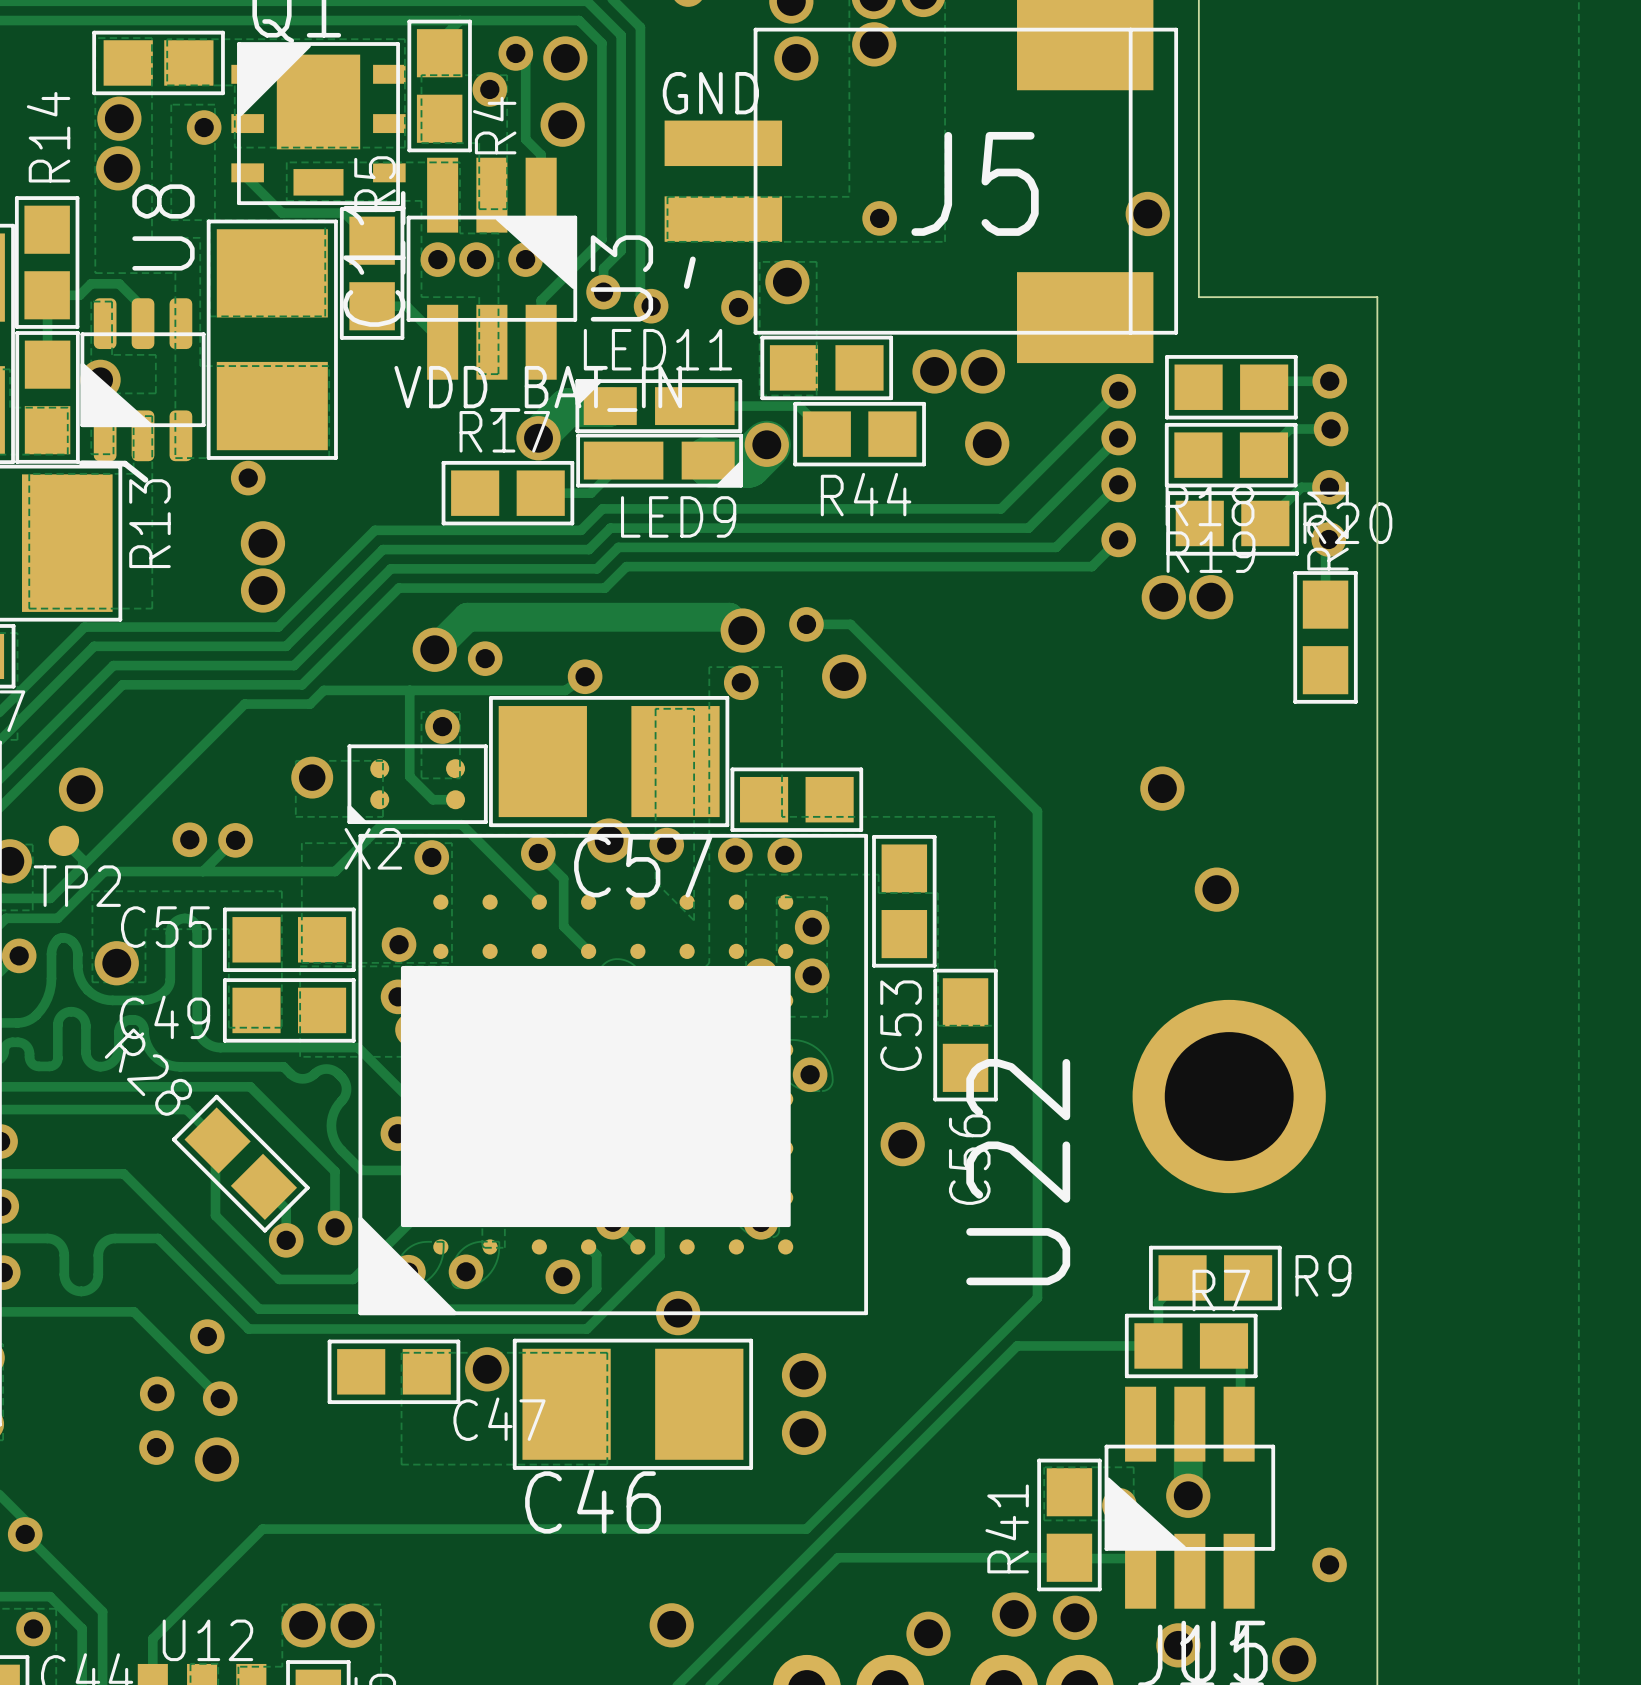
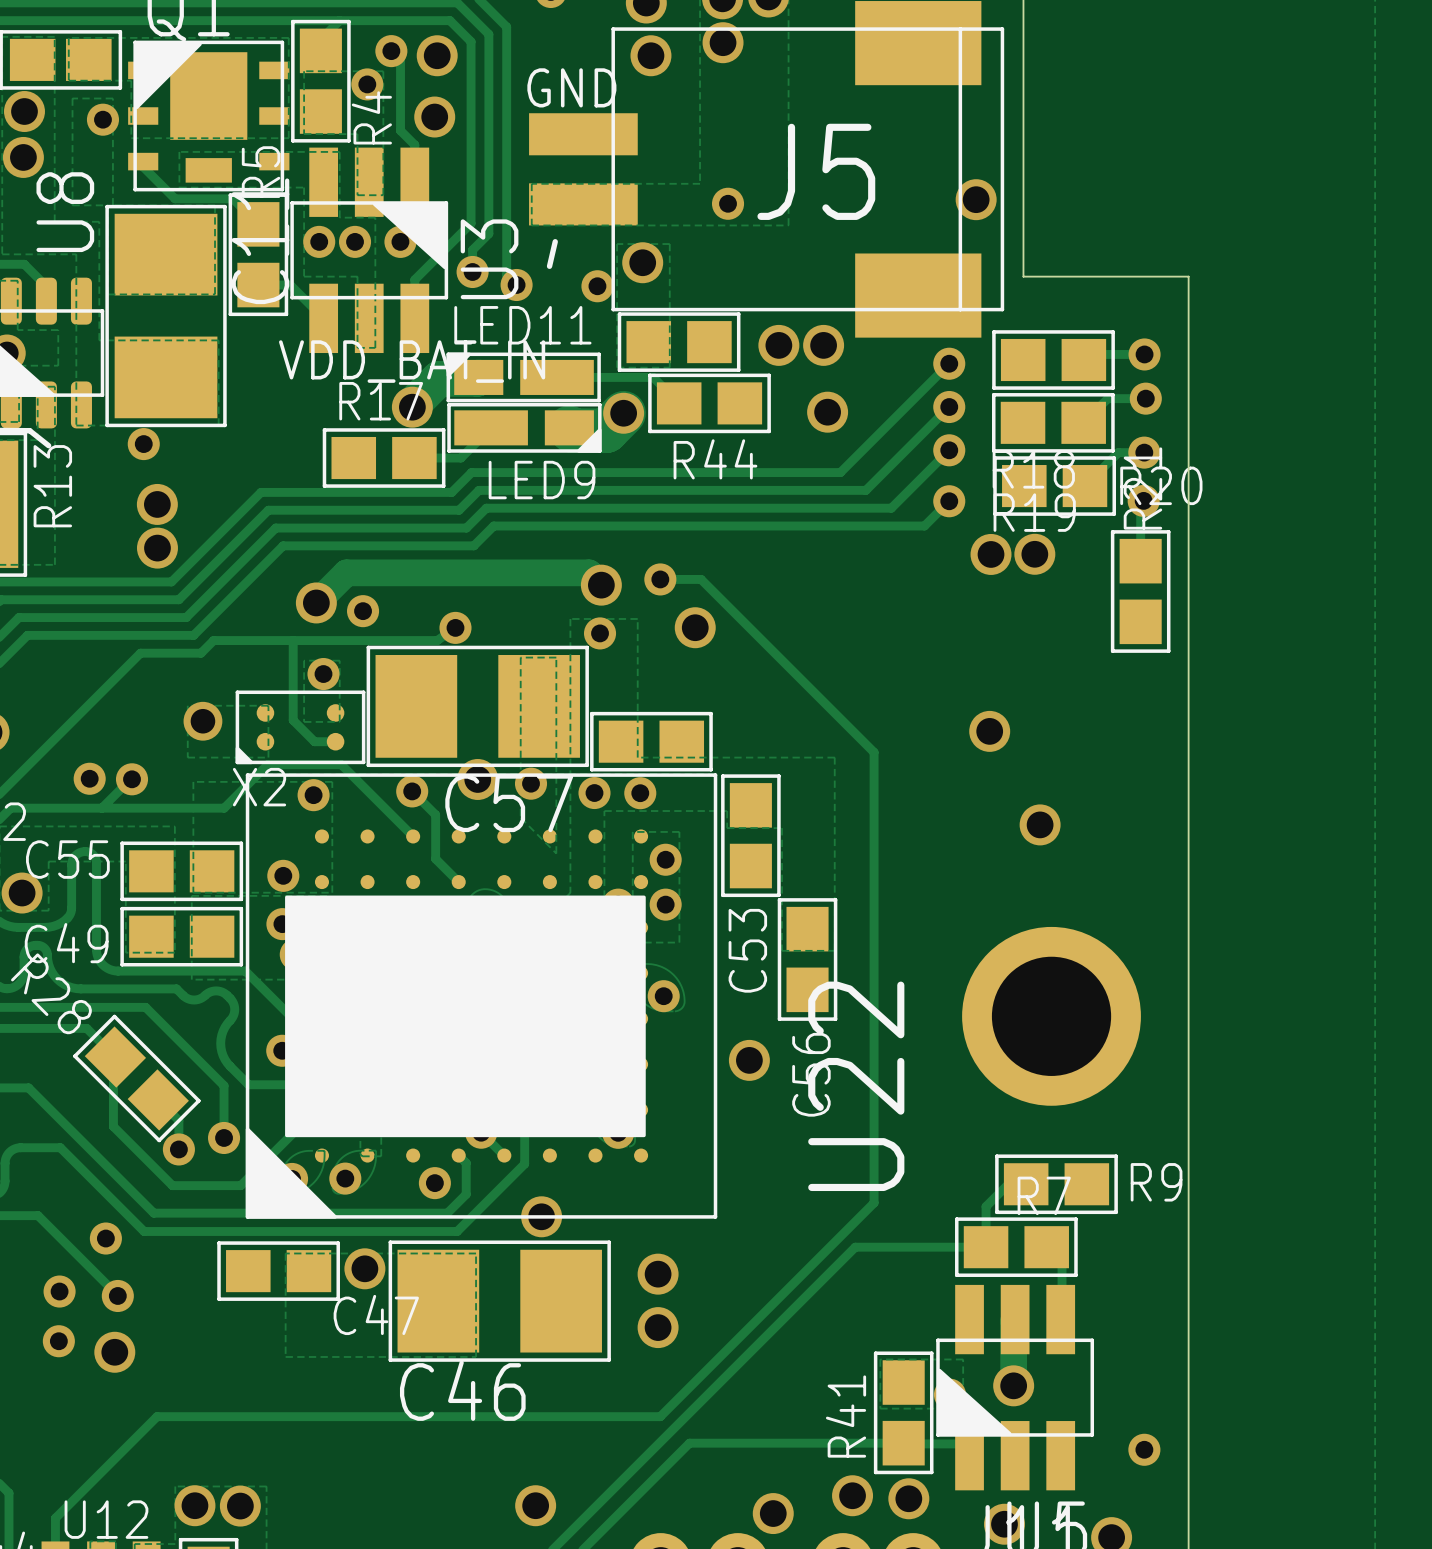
R9 position: (1215, 1277) -> (1056, 1184)

